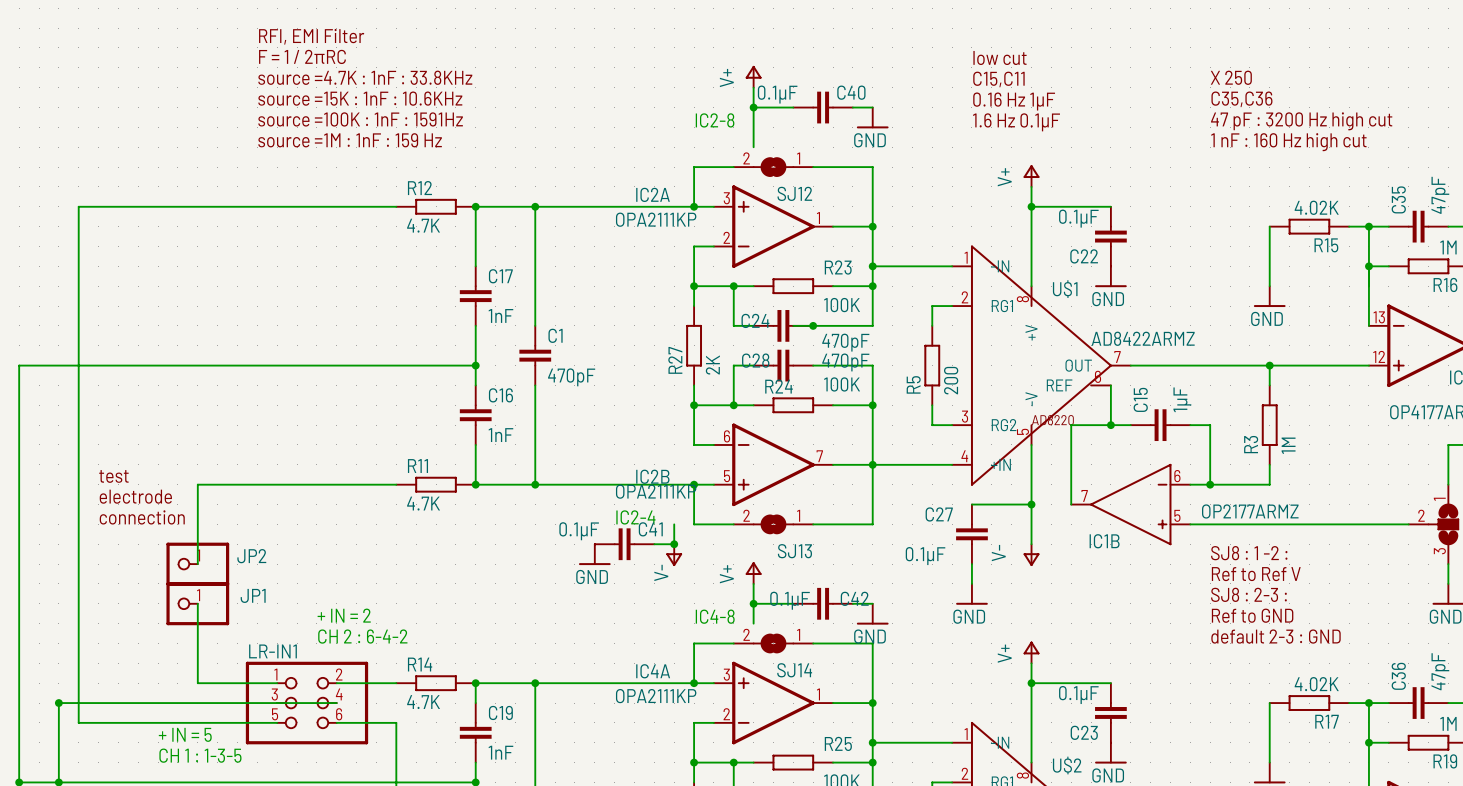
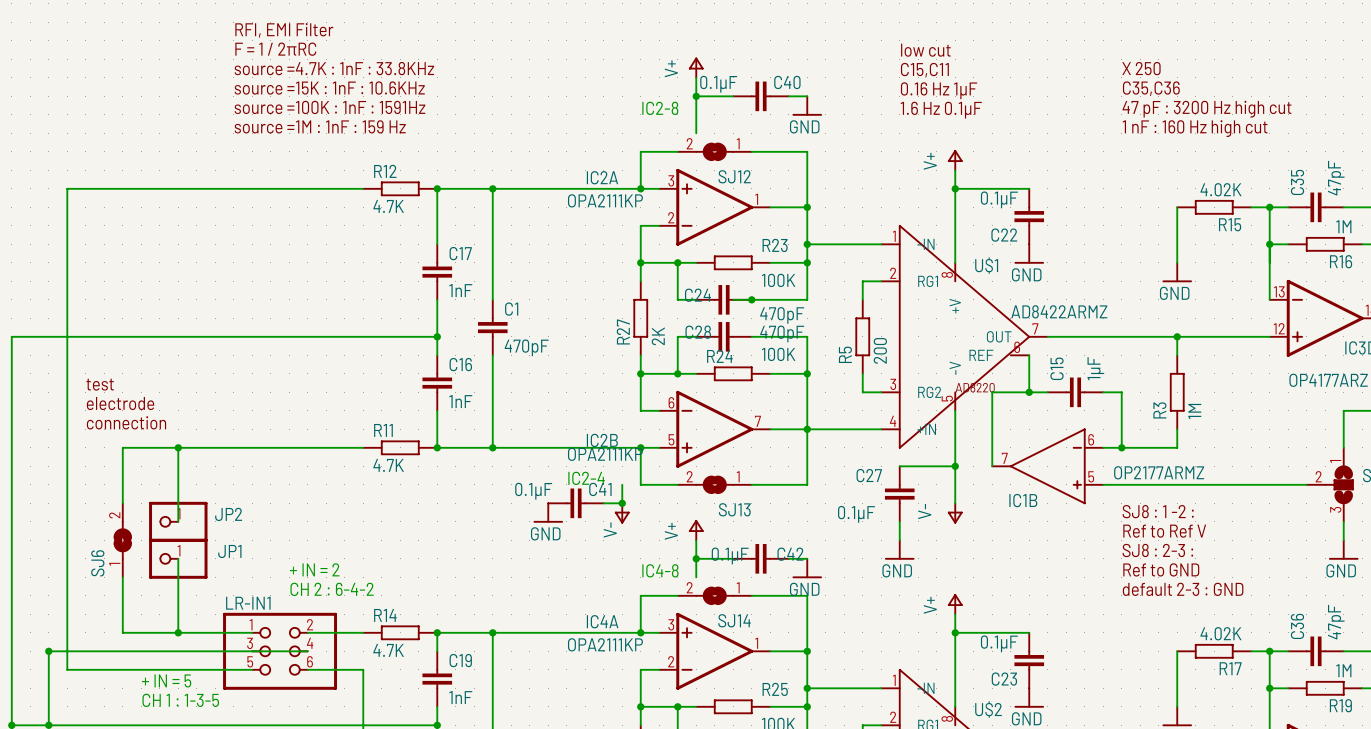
text position: test (113, 476) -> test (100, 384)
wire: none -> (178, 447) (122, 447) (122, 503)
junction: none -> (178, 447)
text position: electrode (135, 496) -> electrode (120, 403)
text position: connection (142, 517) -> connection (126, 422)
SJ6: none -> (122, 540)
wire: none -> (122, 577) (122, 632) (178, 632)
junction: none -> (178, 632)

